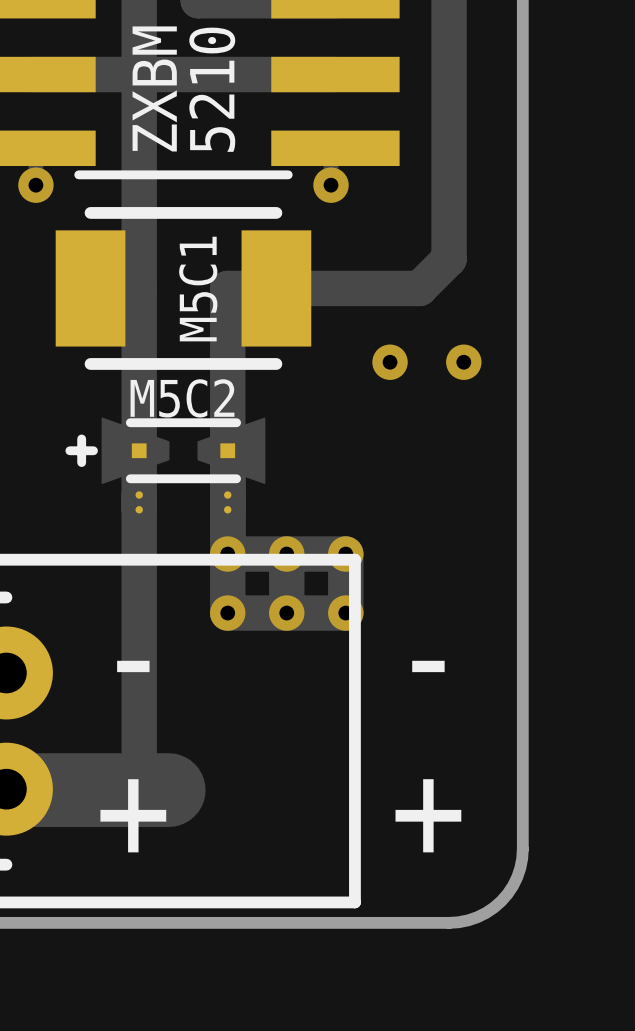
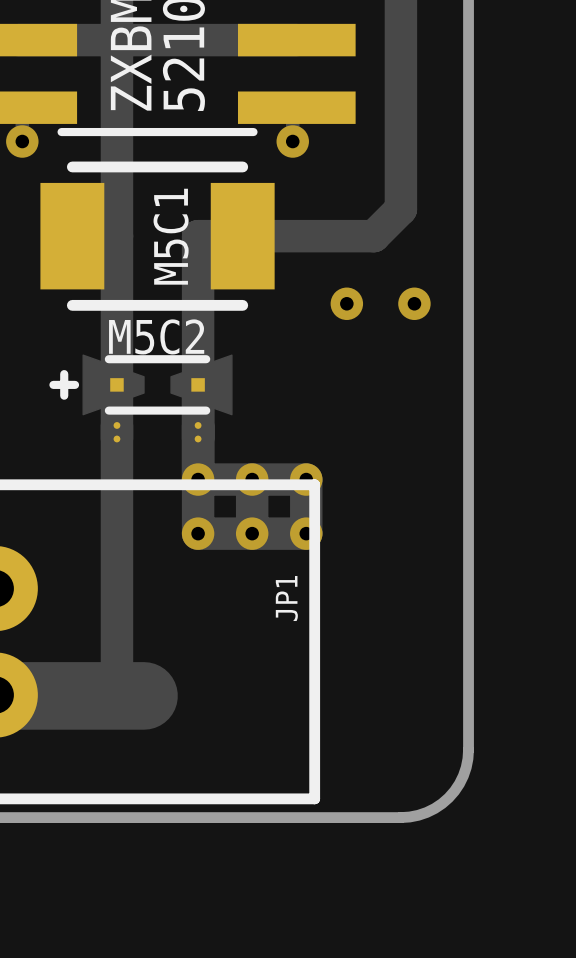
text: - (133, 666) -> none
text: - (428, 666) -> none
JP1 name: none -> JP1 (286, 598)
text: + (133, 815) -> none
text: + (428, 815) -> none

